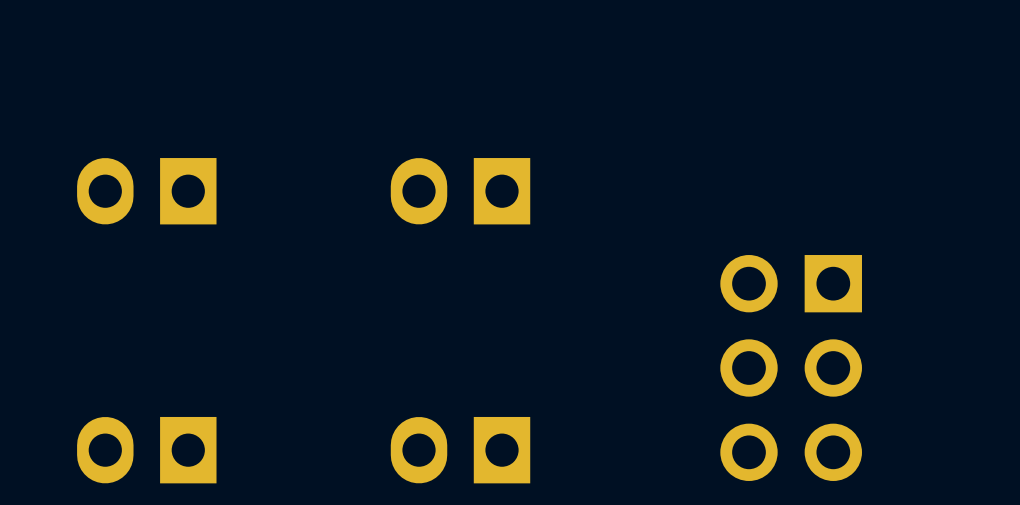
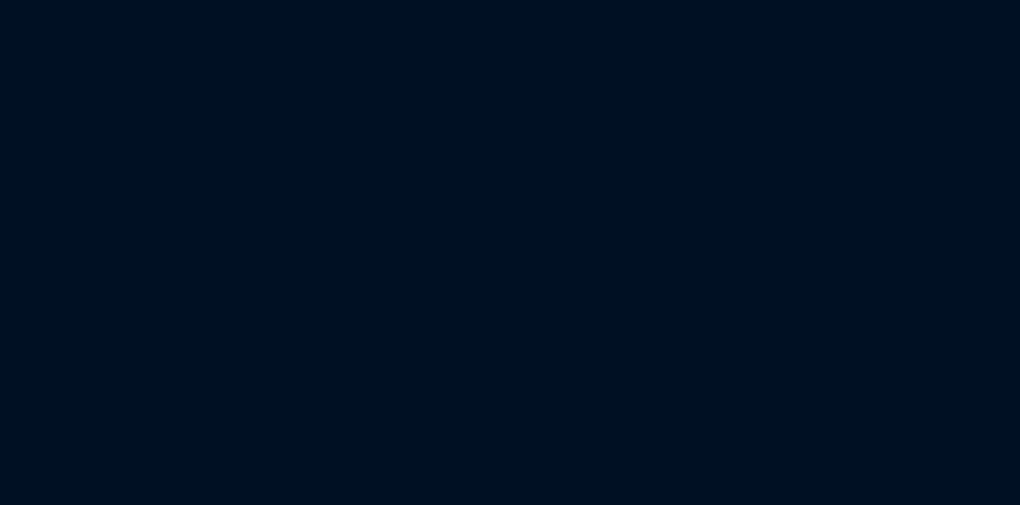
part: (146, 191) -> none
part: (460, 191) -> none
part: (791, 368) -> none
part: (146, 450) -> none
part: (460, 450) -> none

